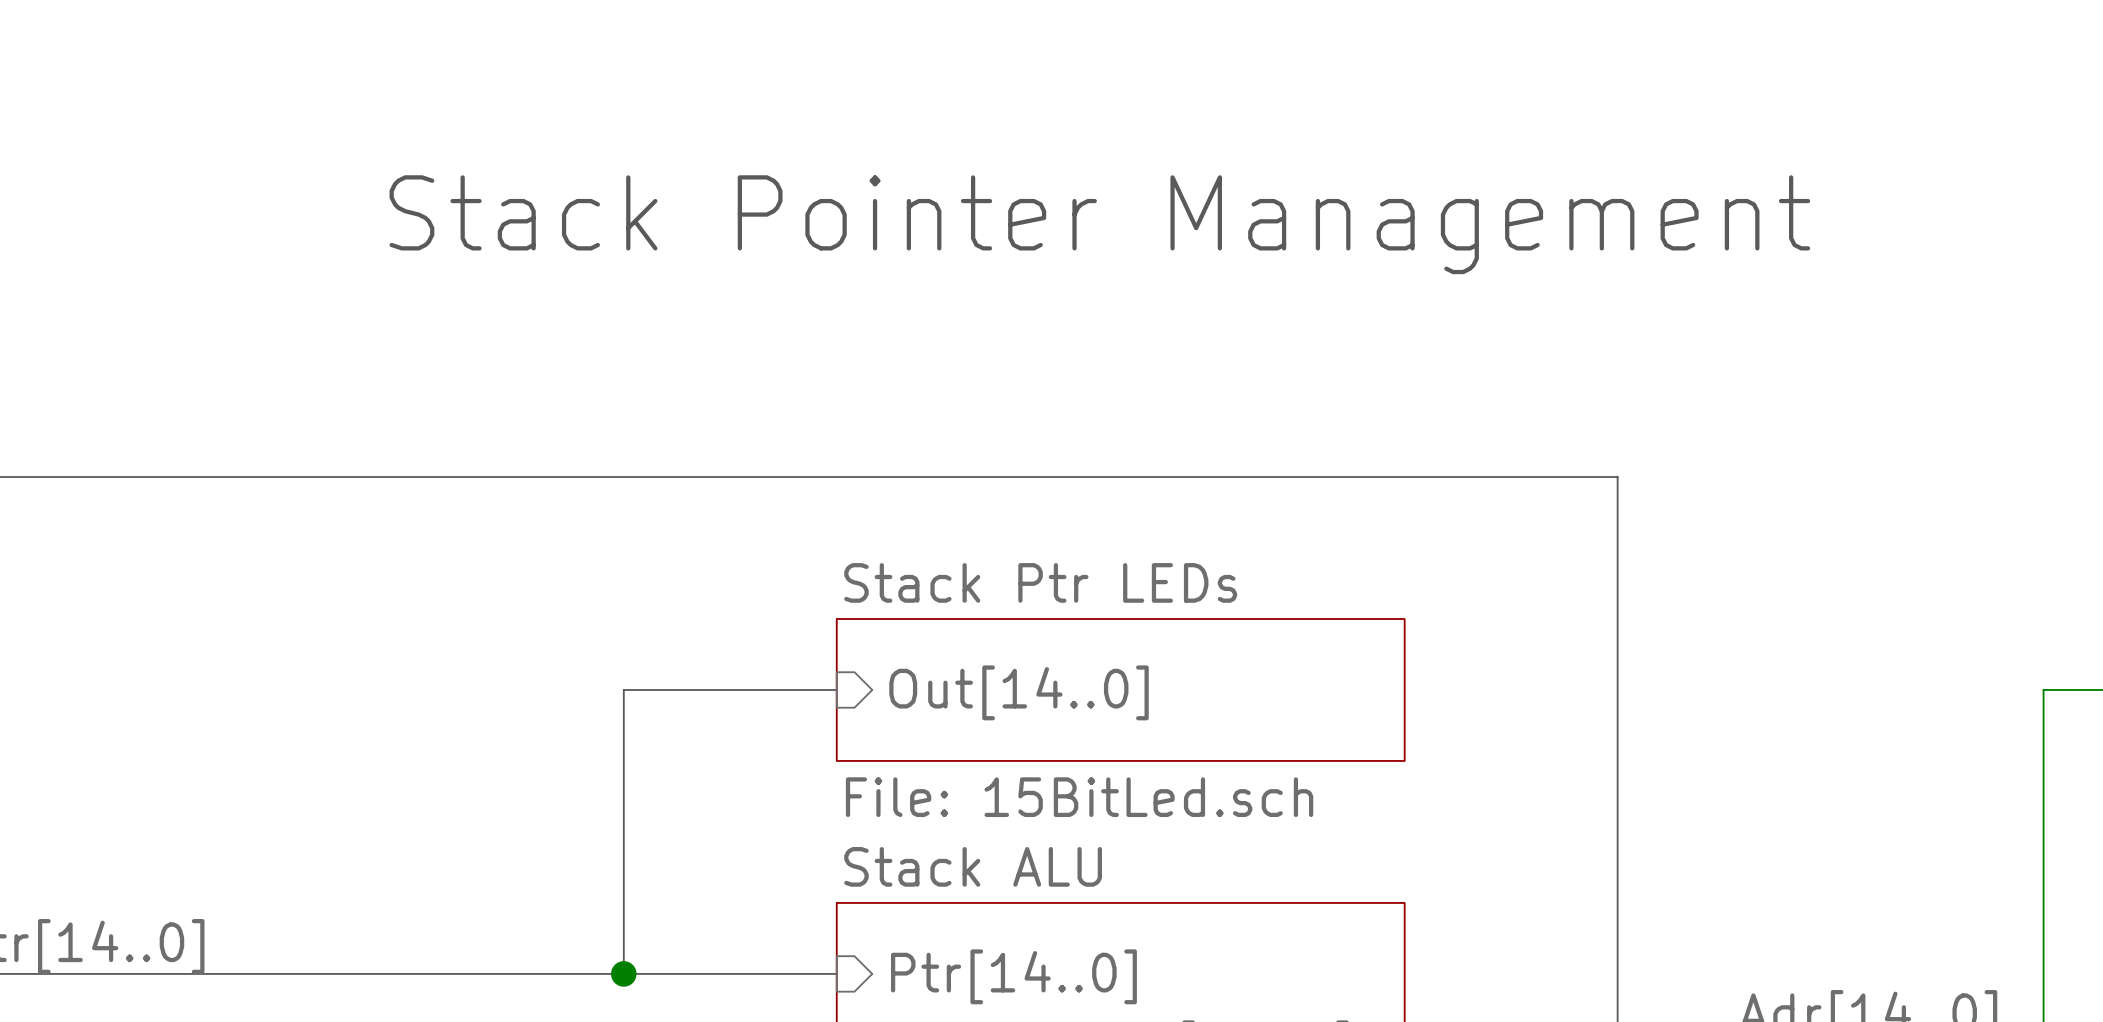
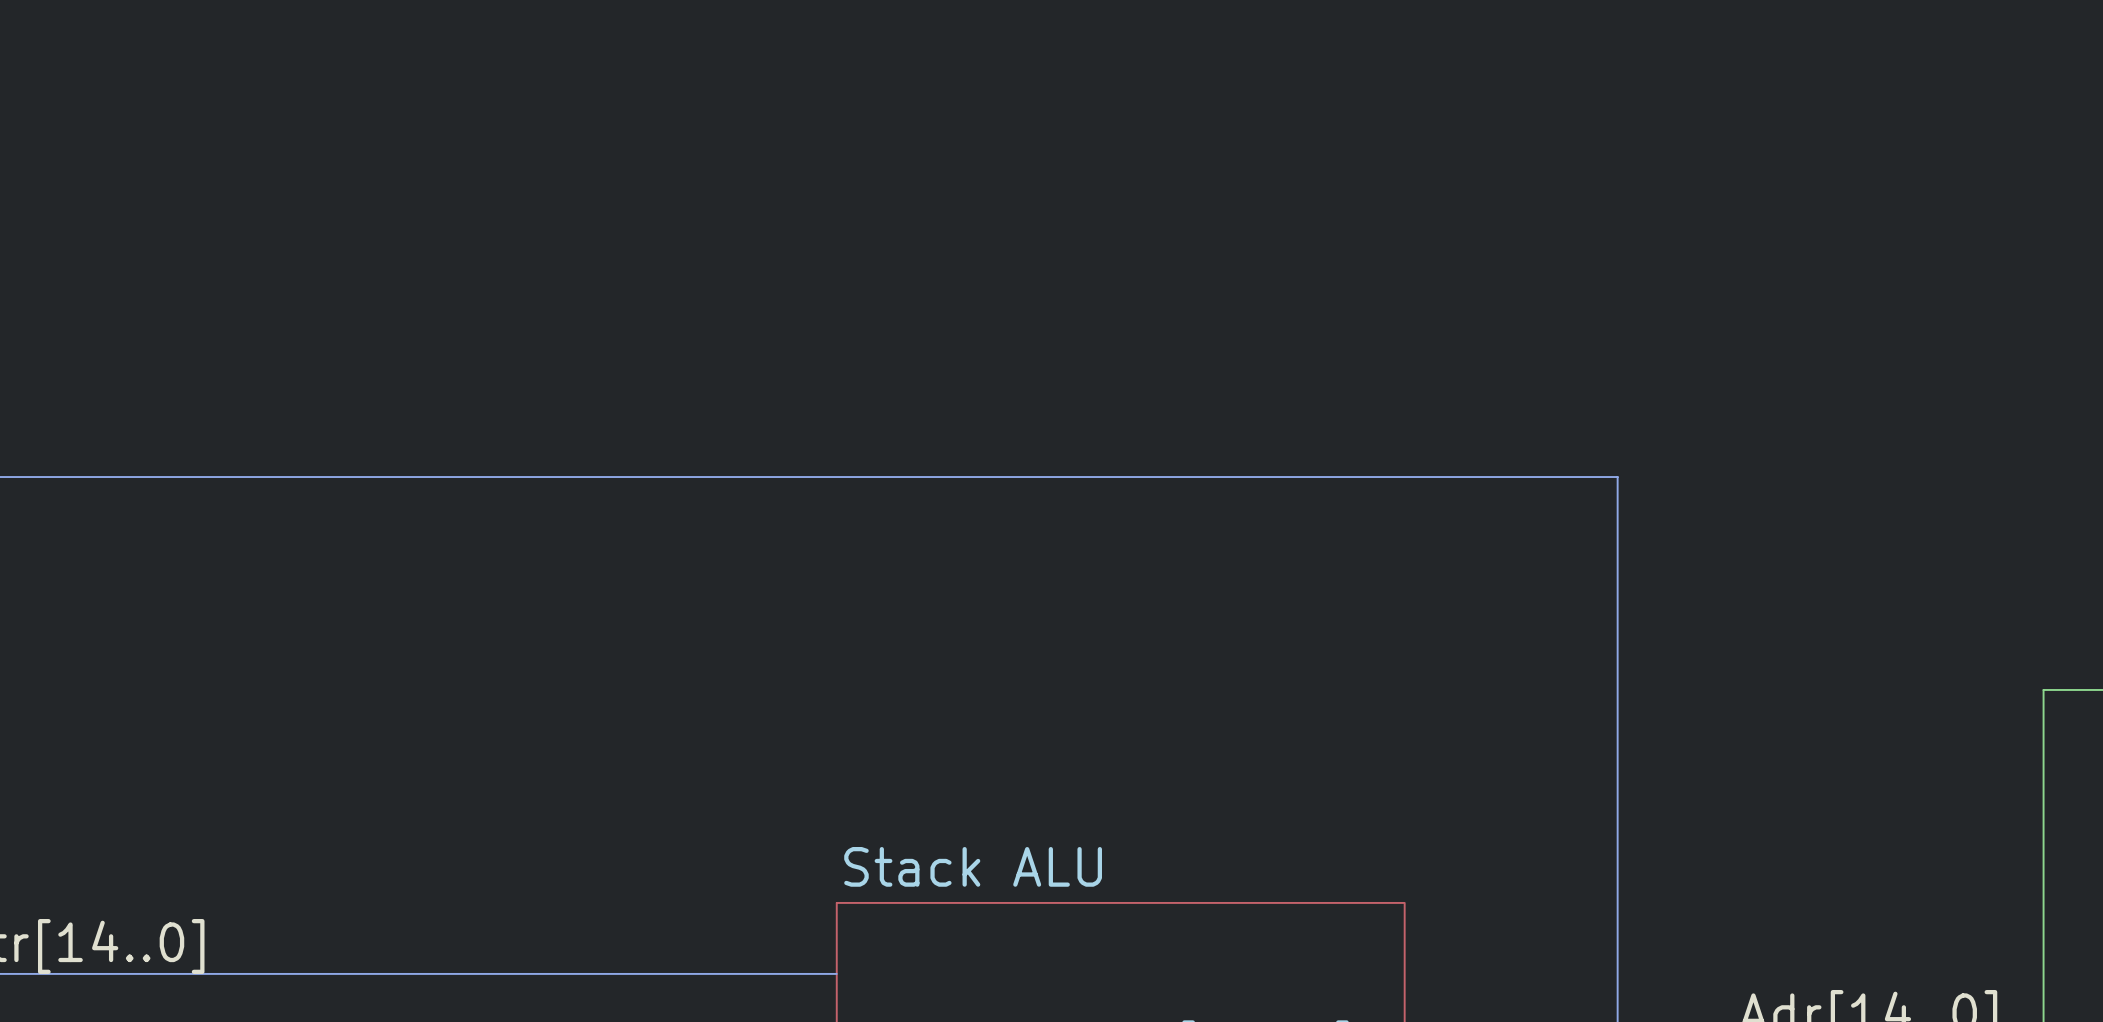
text: Stack Pointer Management (1099, 224) -> none
bus: (836, 689) (623, 689) (623, 973) -> none
sheet Stack Ptr LEDs: File: 15BitLed.sch (1120, 689) -> none
sheet pin: Out[14..0] (1019, 692) -> none
junction: (623, 973) -> none
sheet pin: Ptr[14..0] (1013, 976) -> none

